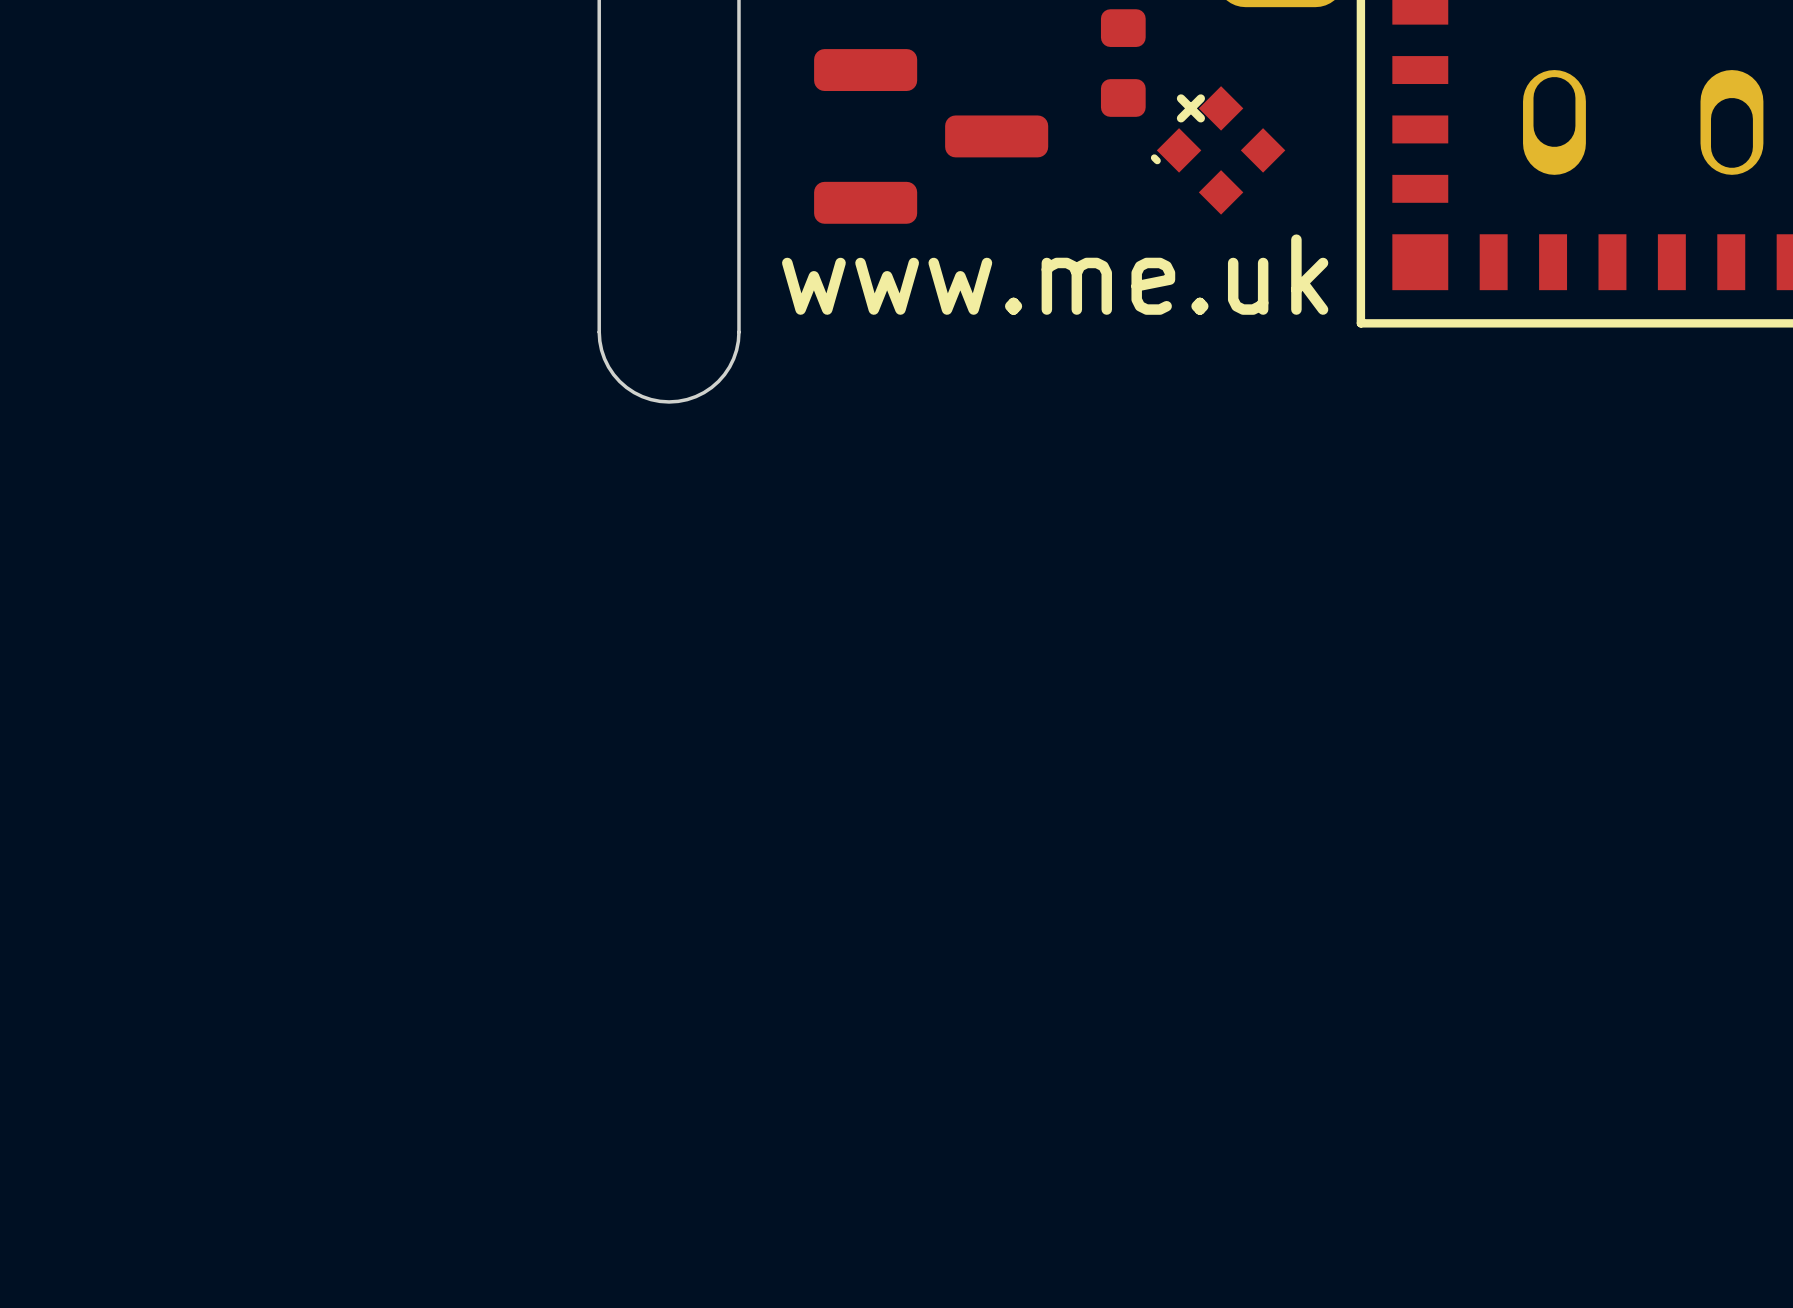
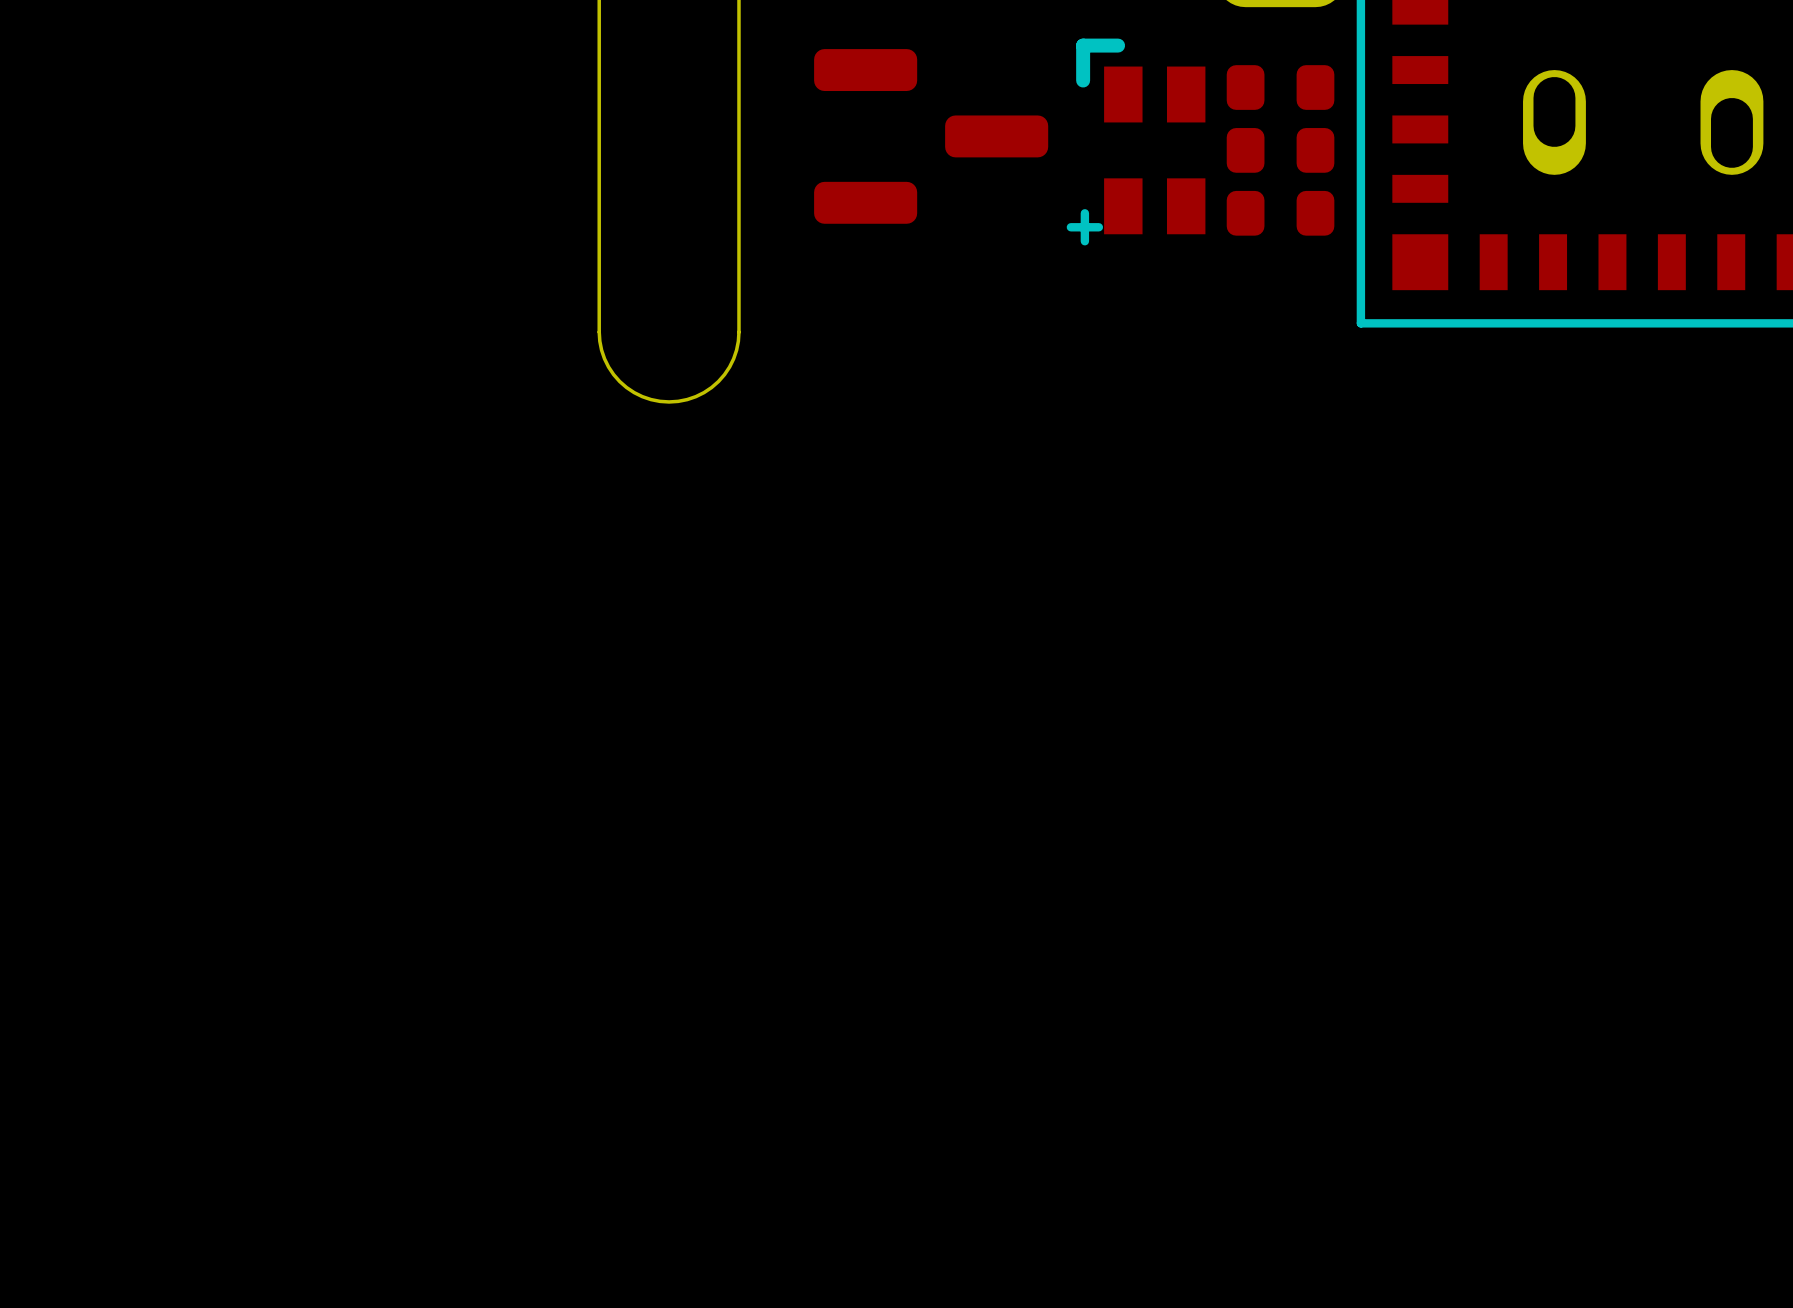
part: (1123, 63) -> none
part: none -> (1280, 87)
part: none -> (1136, 142)
part: (1218, 150) -> none
part: none -> (1280, 150)
part: none -> (1280, 213)
text: www.me.uk (1055, 274) -> none

